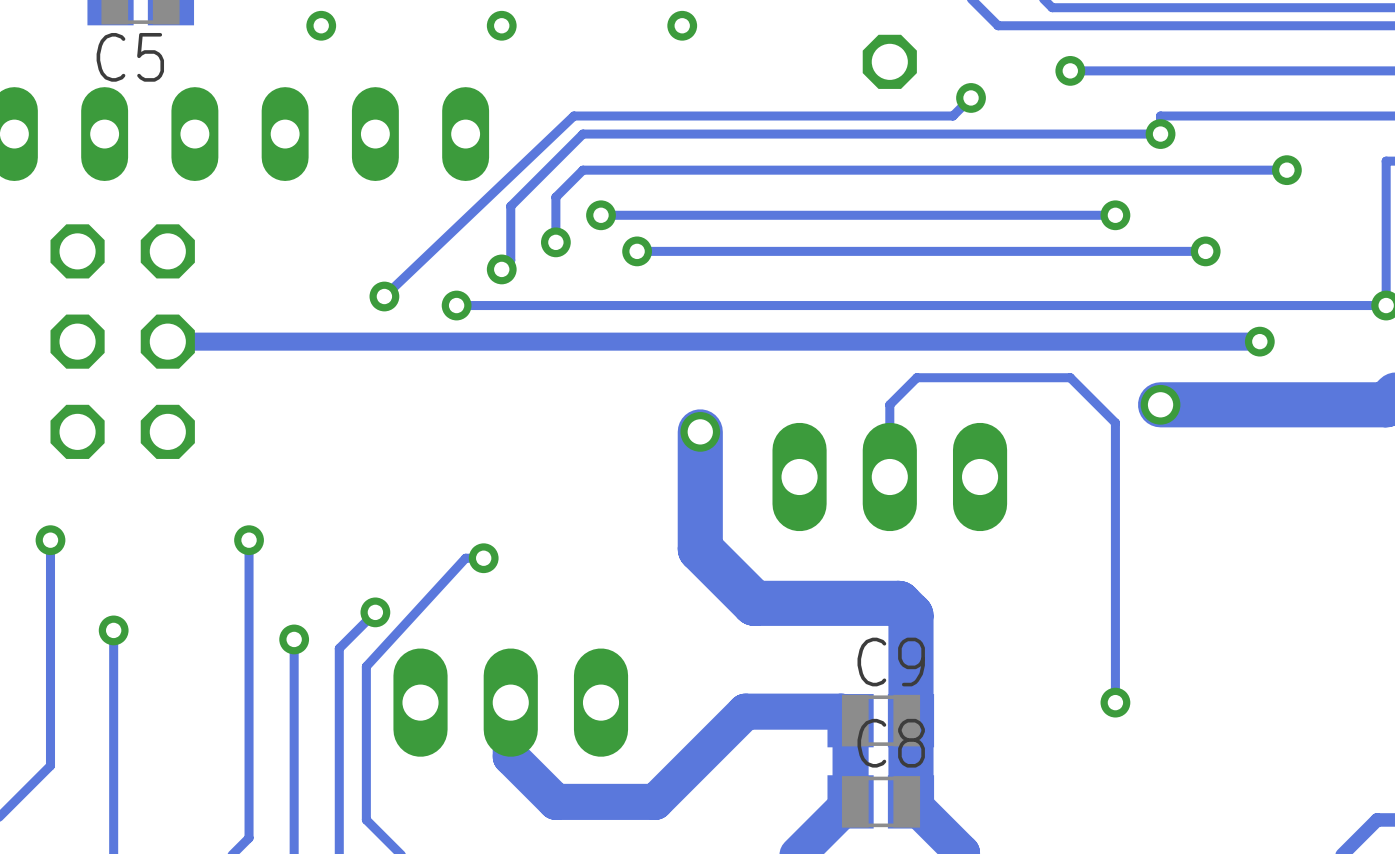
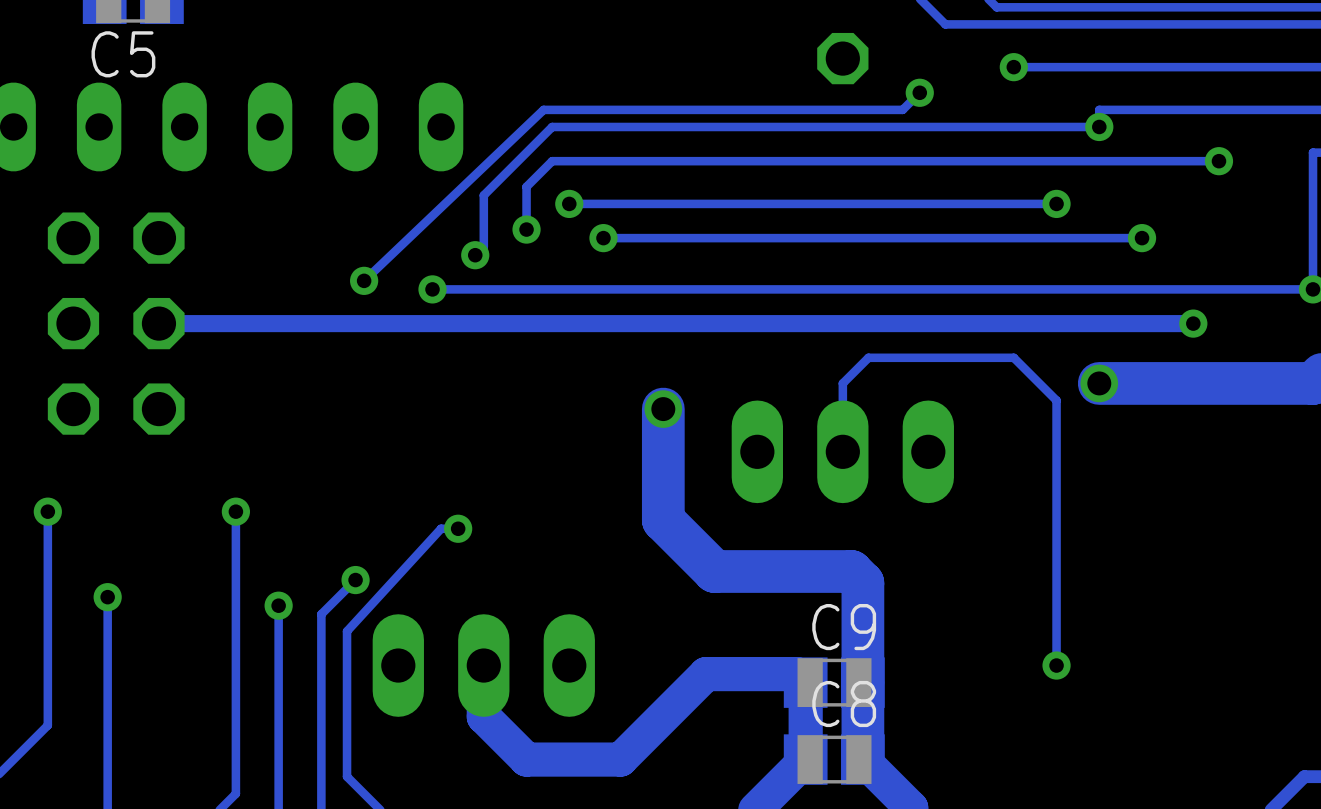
via: (321, 25) -> none
via: (501, 25) -> none
via: (682, 25) -> none

